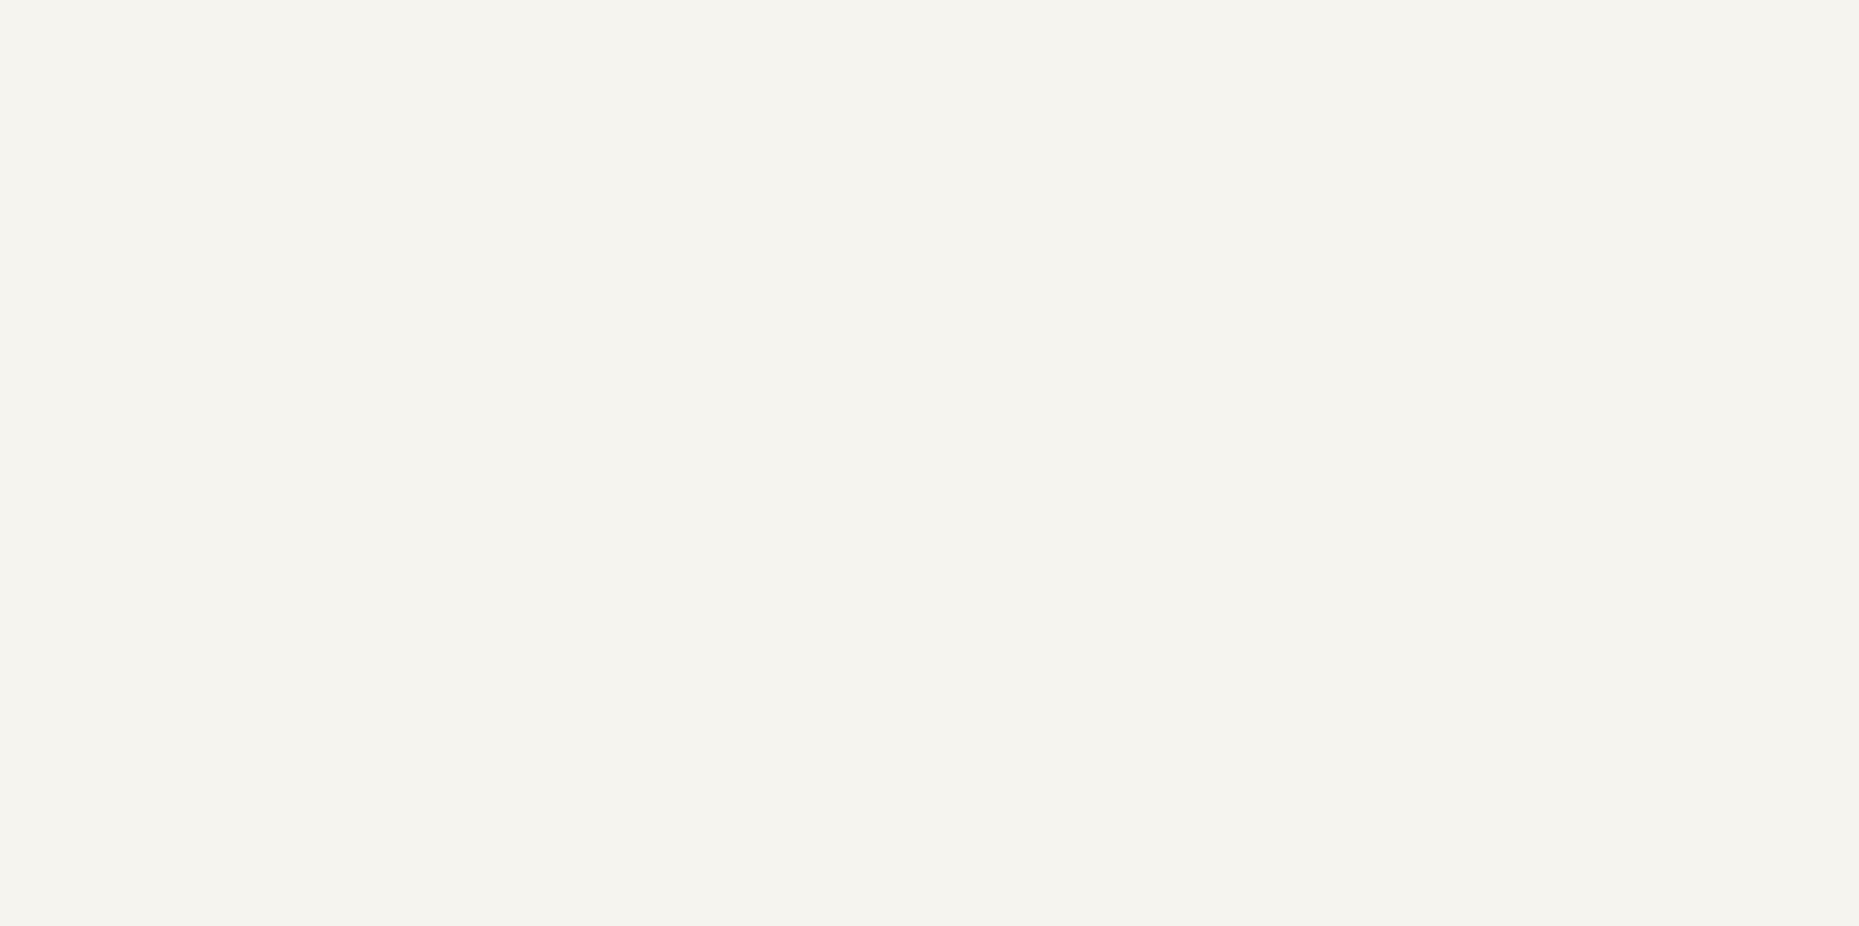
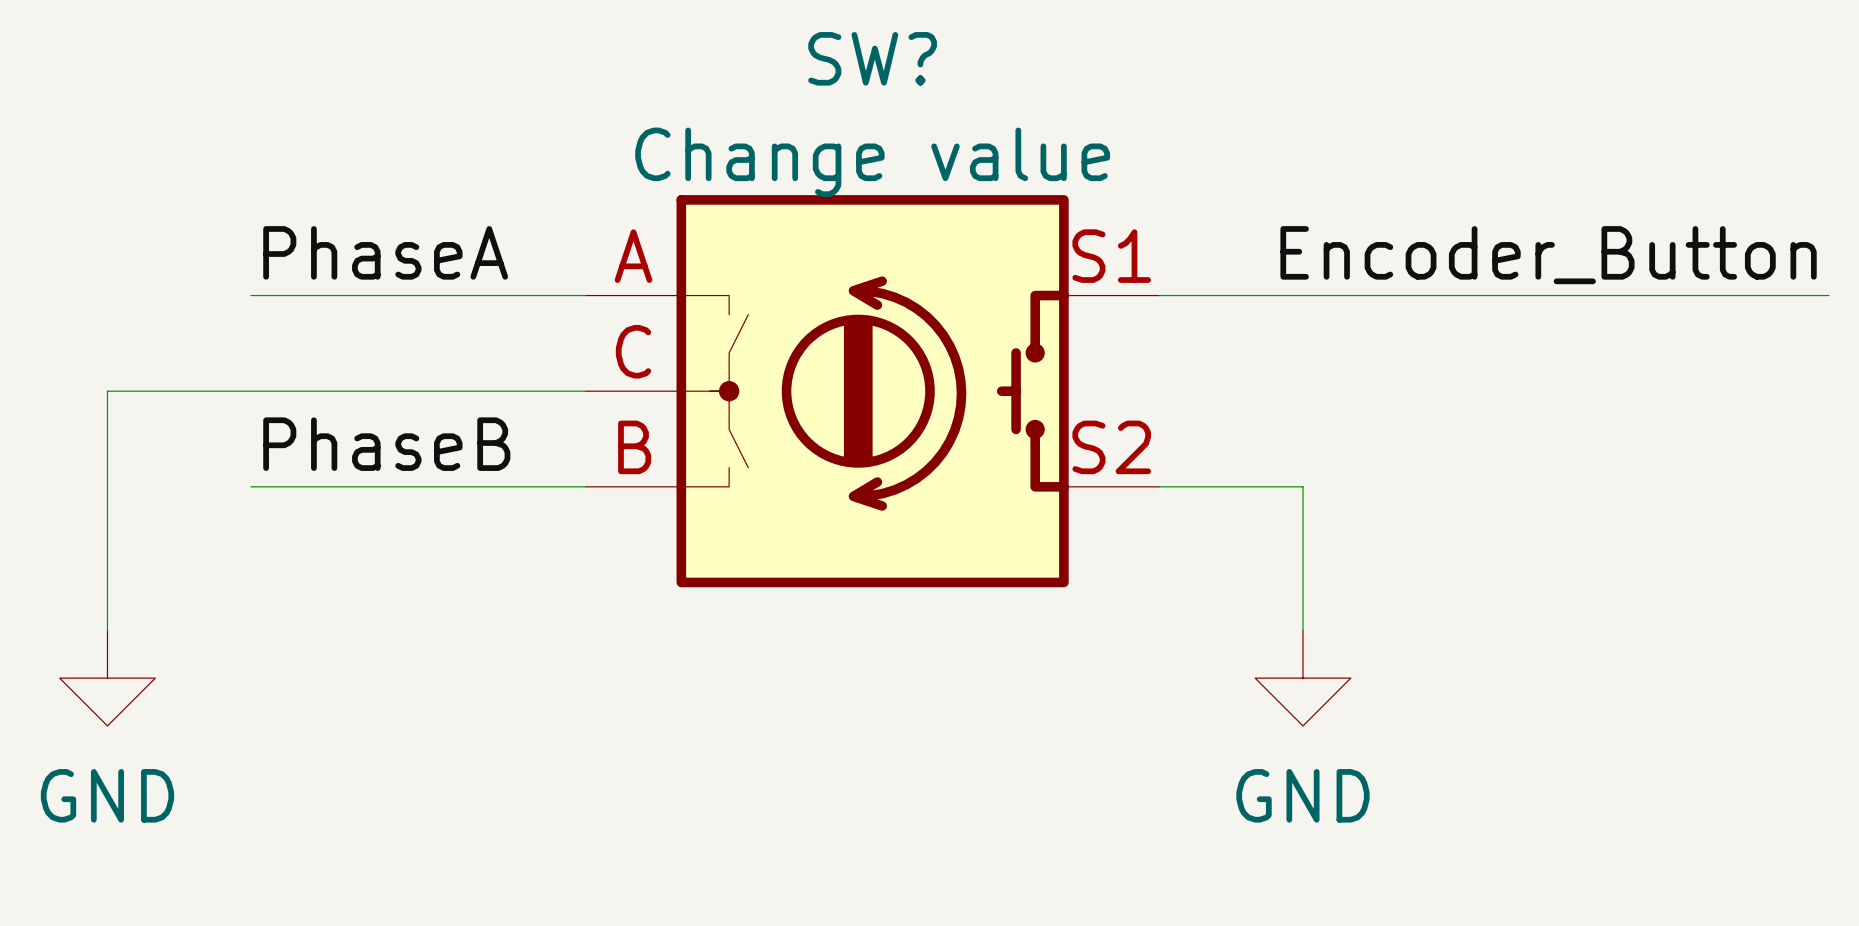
label: none -> PhaseA (385, 252)
label: none -> Encoder_Button (1548, 255)
wire: none -> (250, 295) (585, 295)
wire: none -> (1159, 295) (1829, 295)
wire: none -> (585, 391) (107, 391) (107, 630)
SW?: none -> Change value (872, 391)
label: none -> PhaseB (386, 444)
wire: none -> (250, 486) (585, 486)
wire: none -> (1159, 486) (1302, 486) (1302, 630)
power symbol: none -> GND (107, 678)
power symbol: none -> GND (1302, 678)

